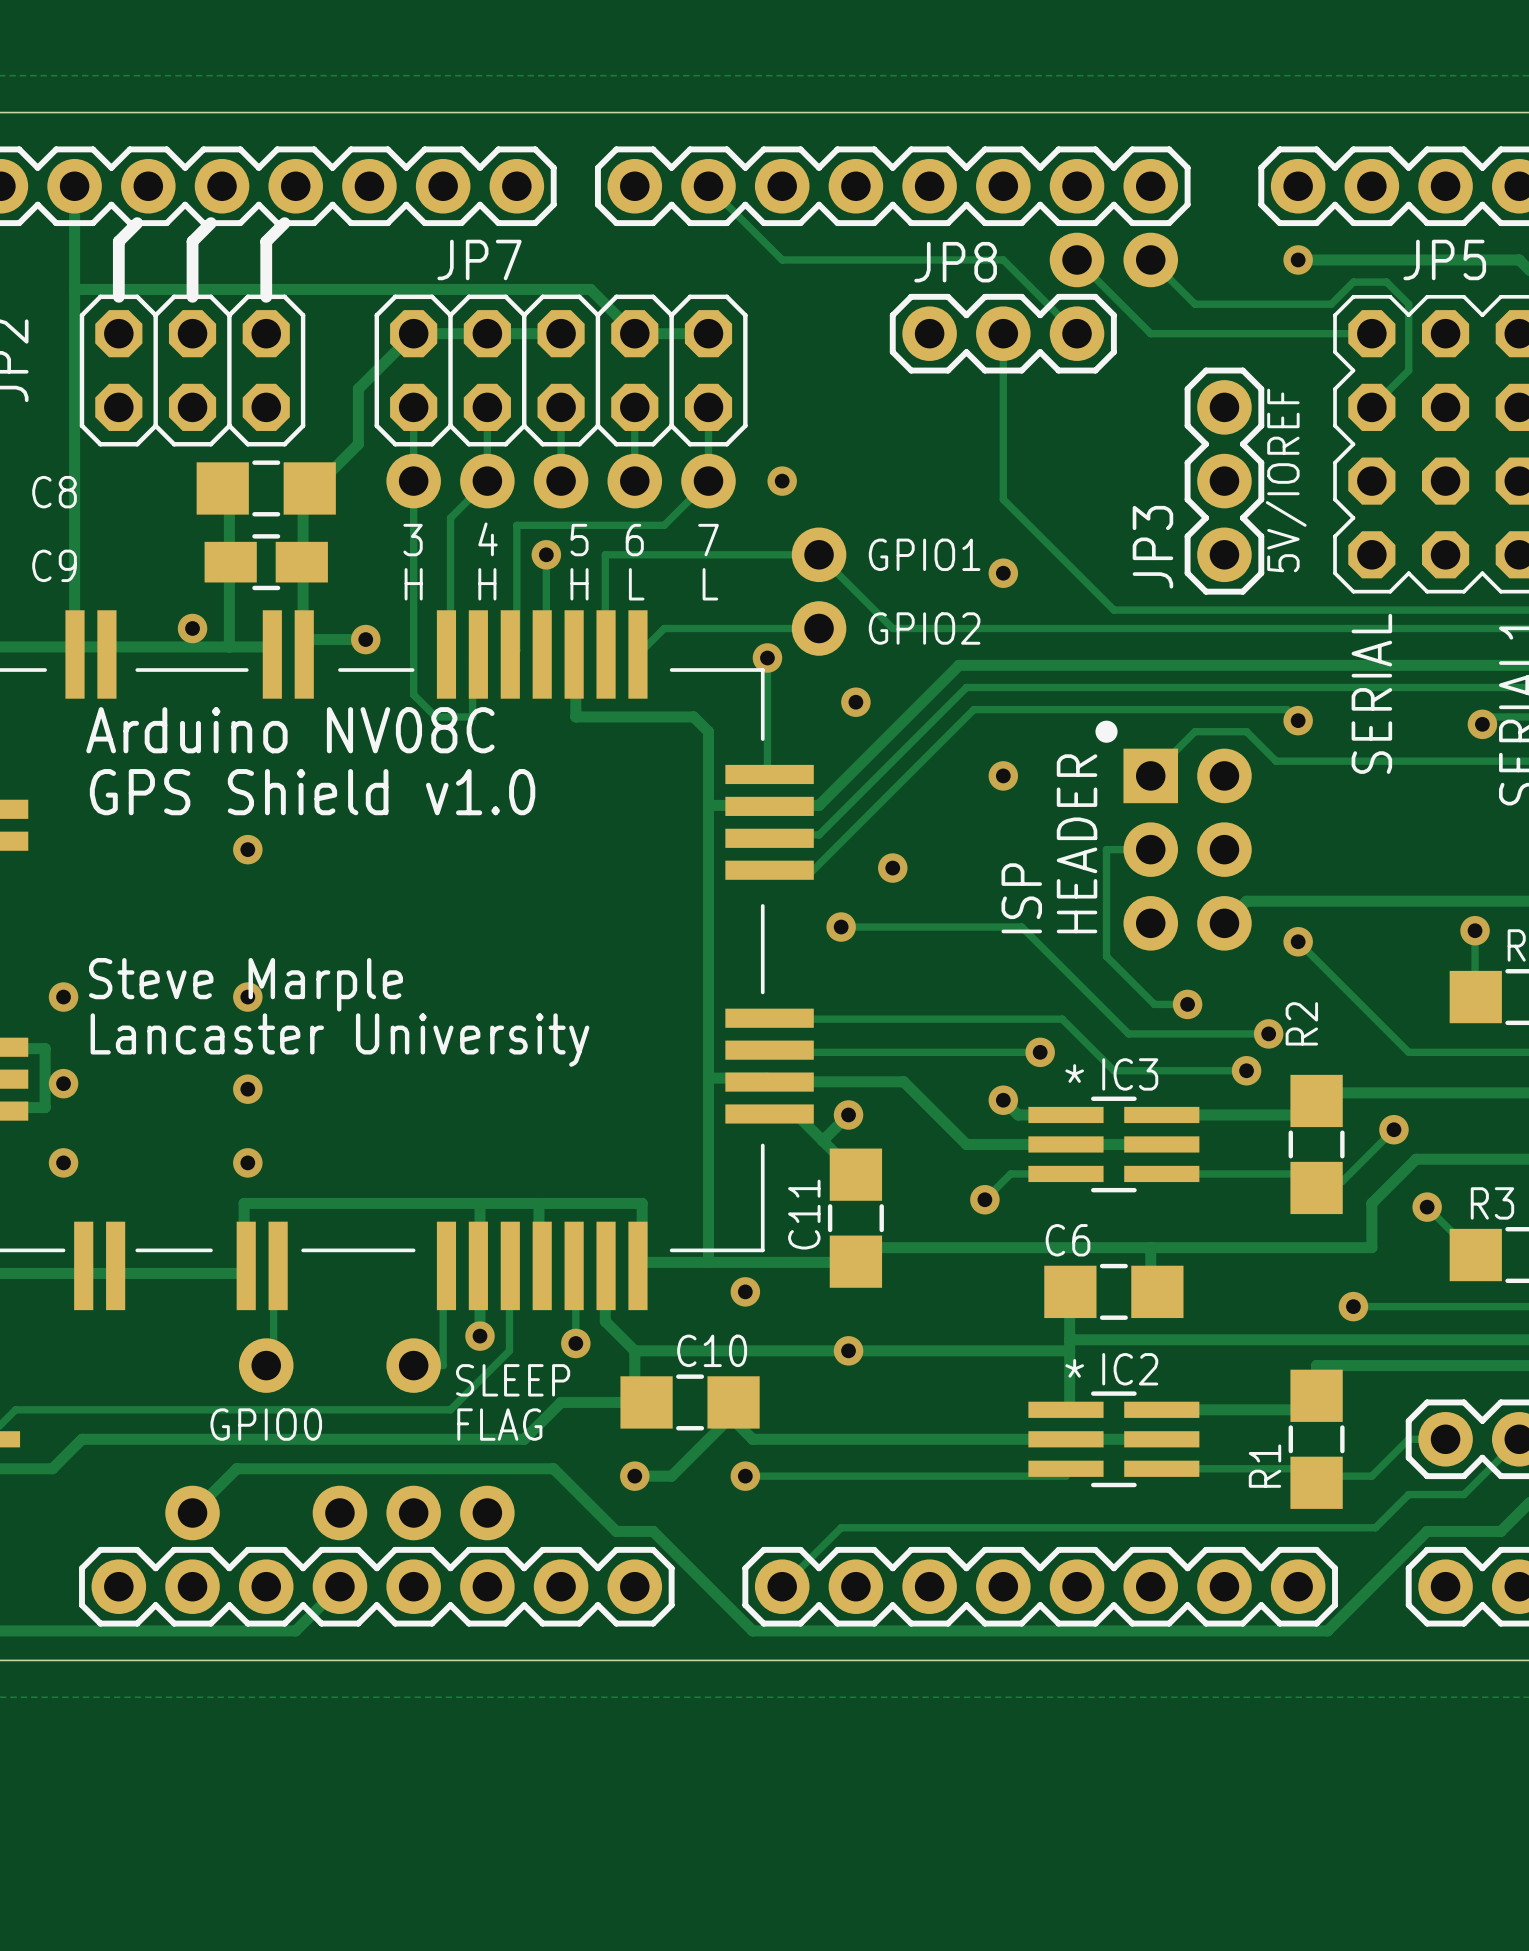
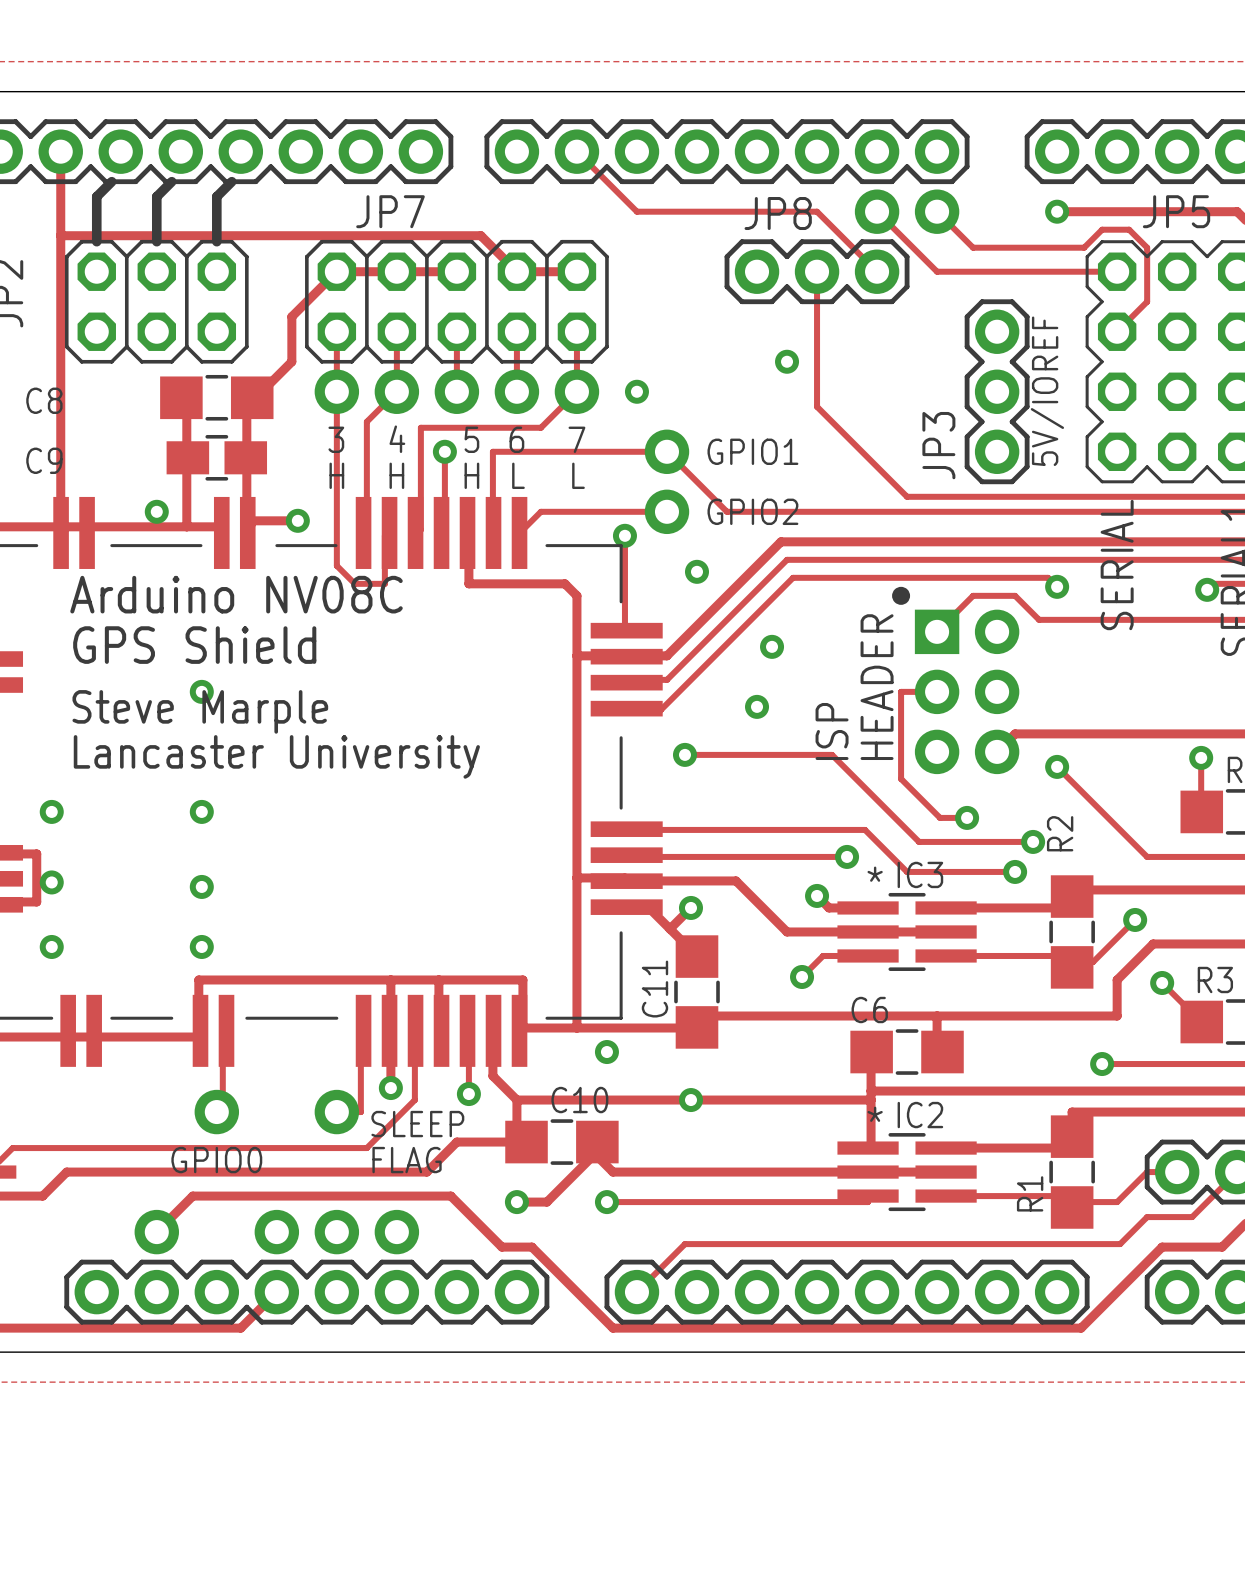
via: none -> (787, 361)
via: (1003, 573) -> none
via: (1003, 775) -> none
text: GPS Shield v1.0 (312, 792) -> GPS Shield (194, 645)
via: none -> (772, 646)
via position: (892, 868) -> (757, 706)
text position: Steve Marple (245, 984) -> Steve Marple (200, 711)
text position: Lancaster University (339, 1040) -> Lancaster University (276, 756)

